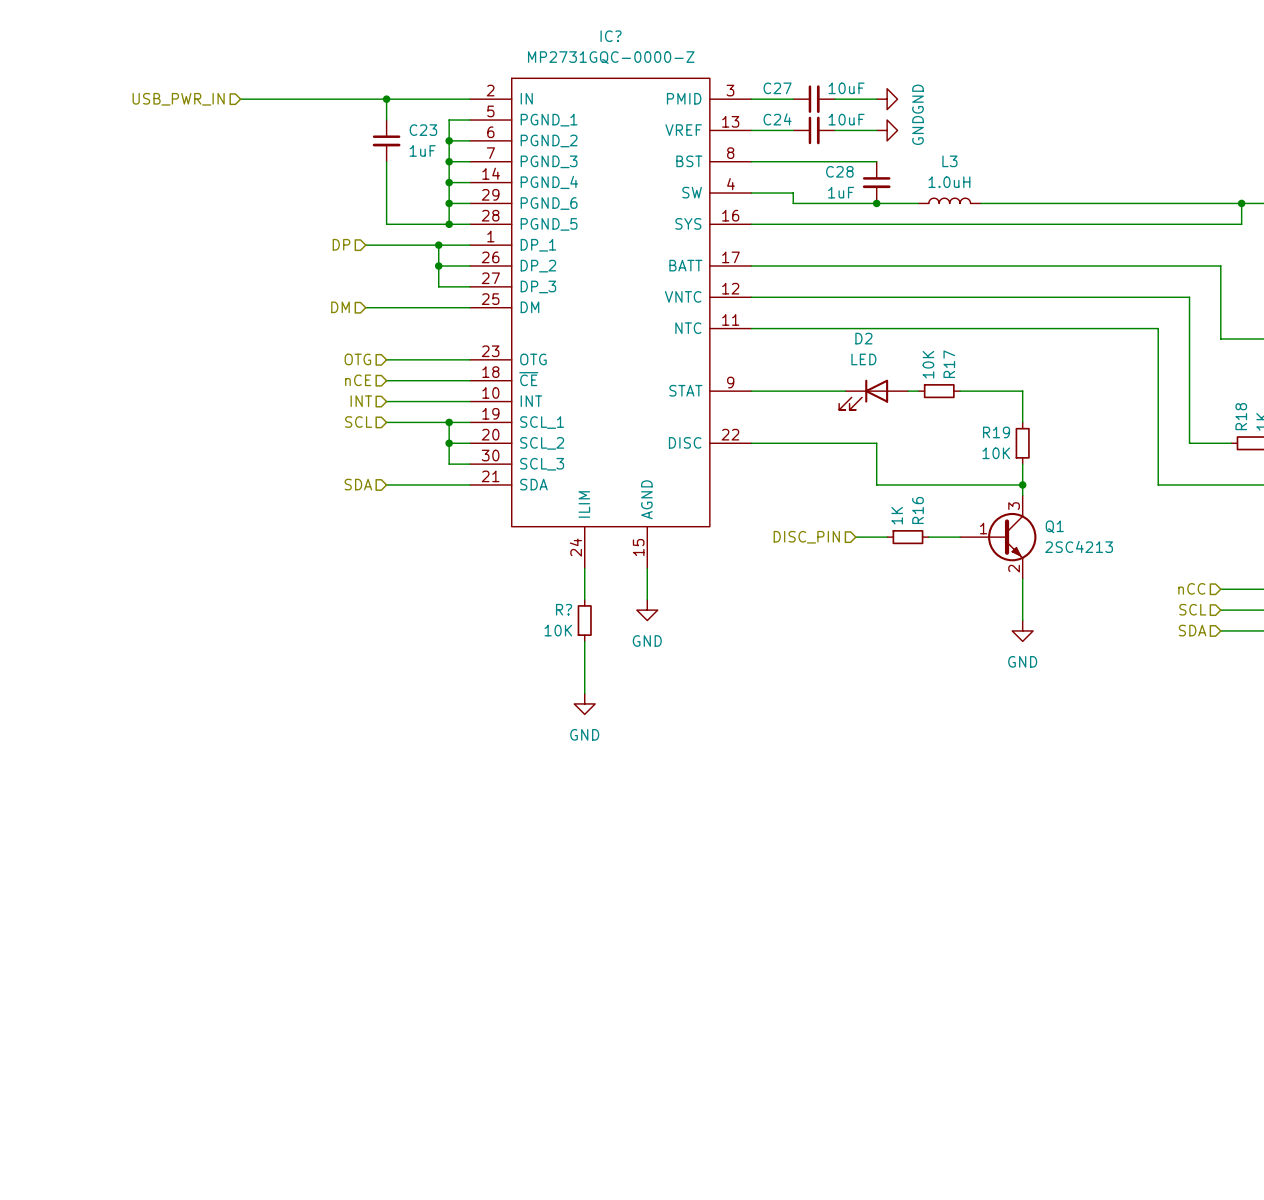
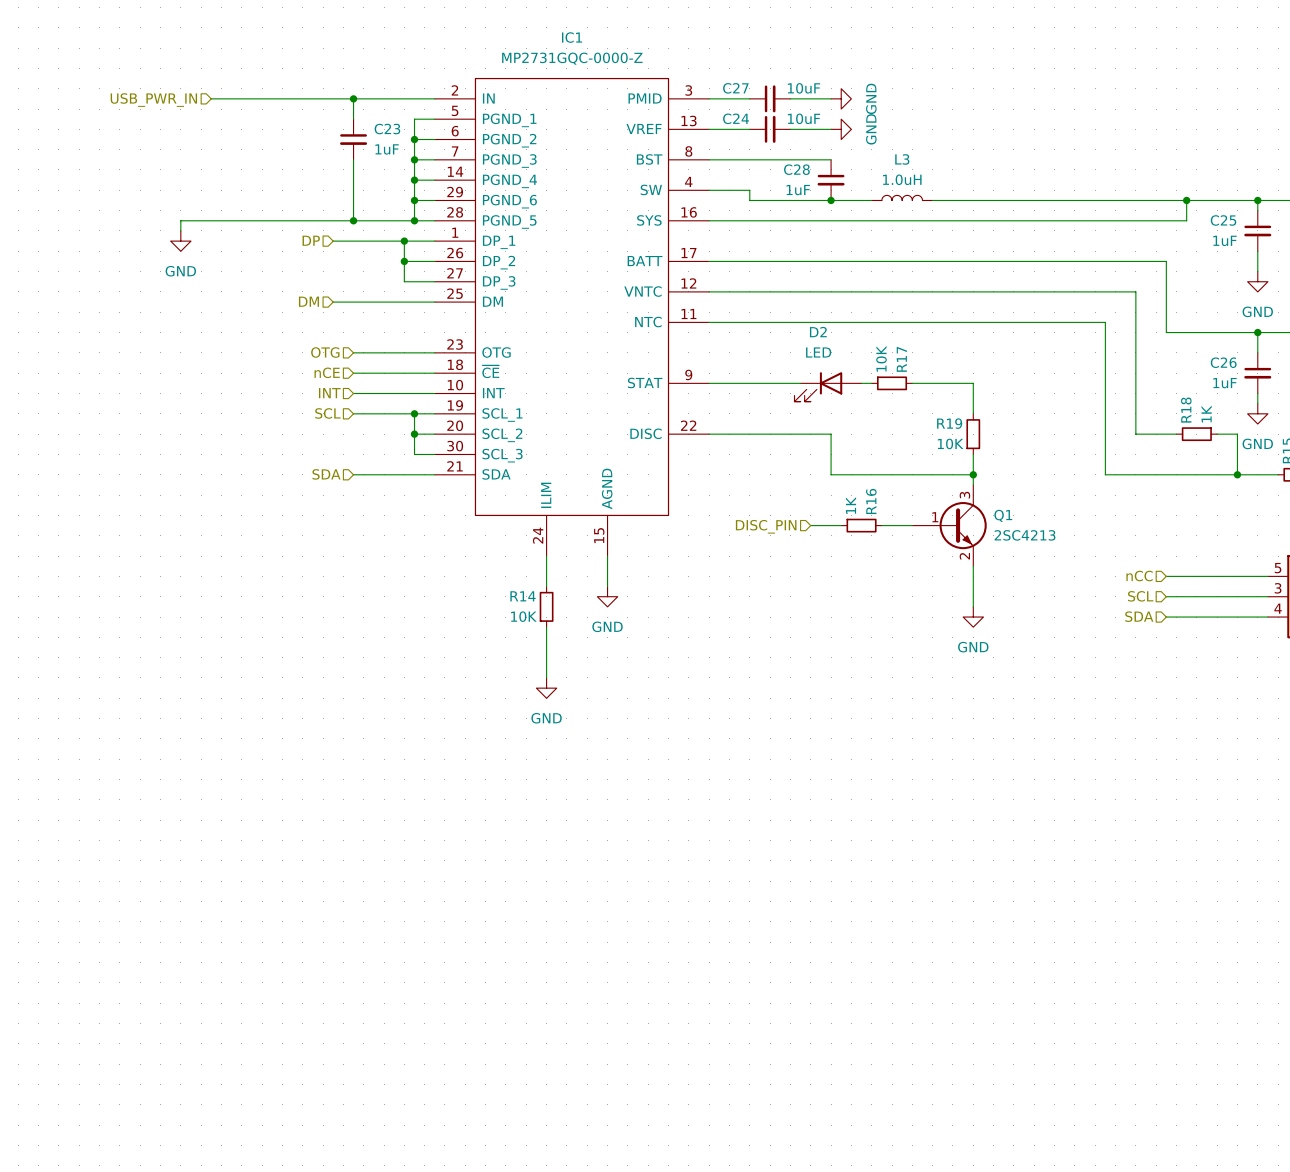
IC? name: IC? (611, 36) -> IC1 (572, 37)
wire: none -> (353, 220) (180, 220) (180, 230)
junction: none -> (353, 220)
power symbol: none -> GND (180, 241)
R? name: R? (564, 609) -> R14 (523, 596)

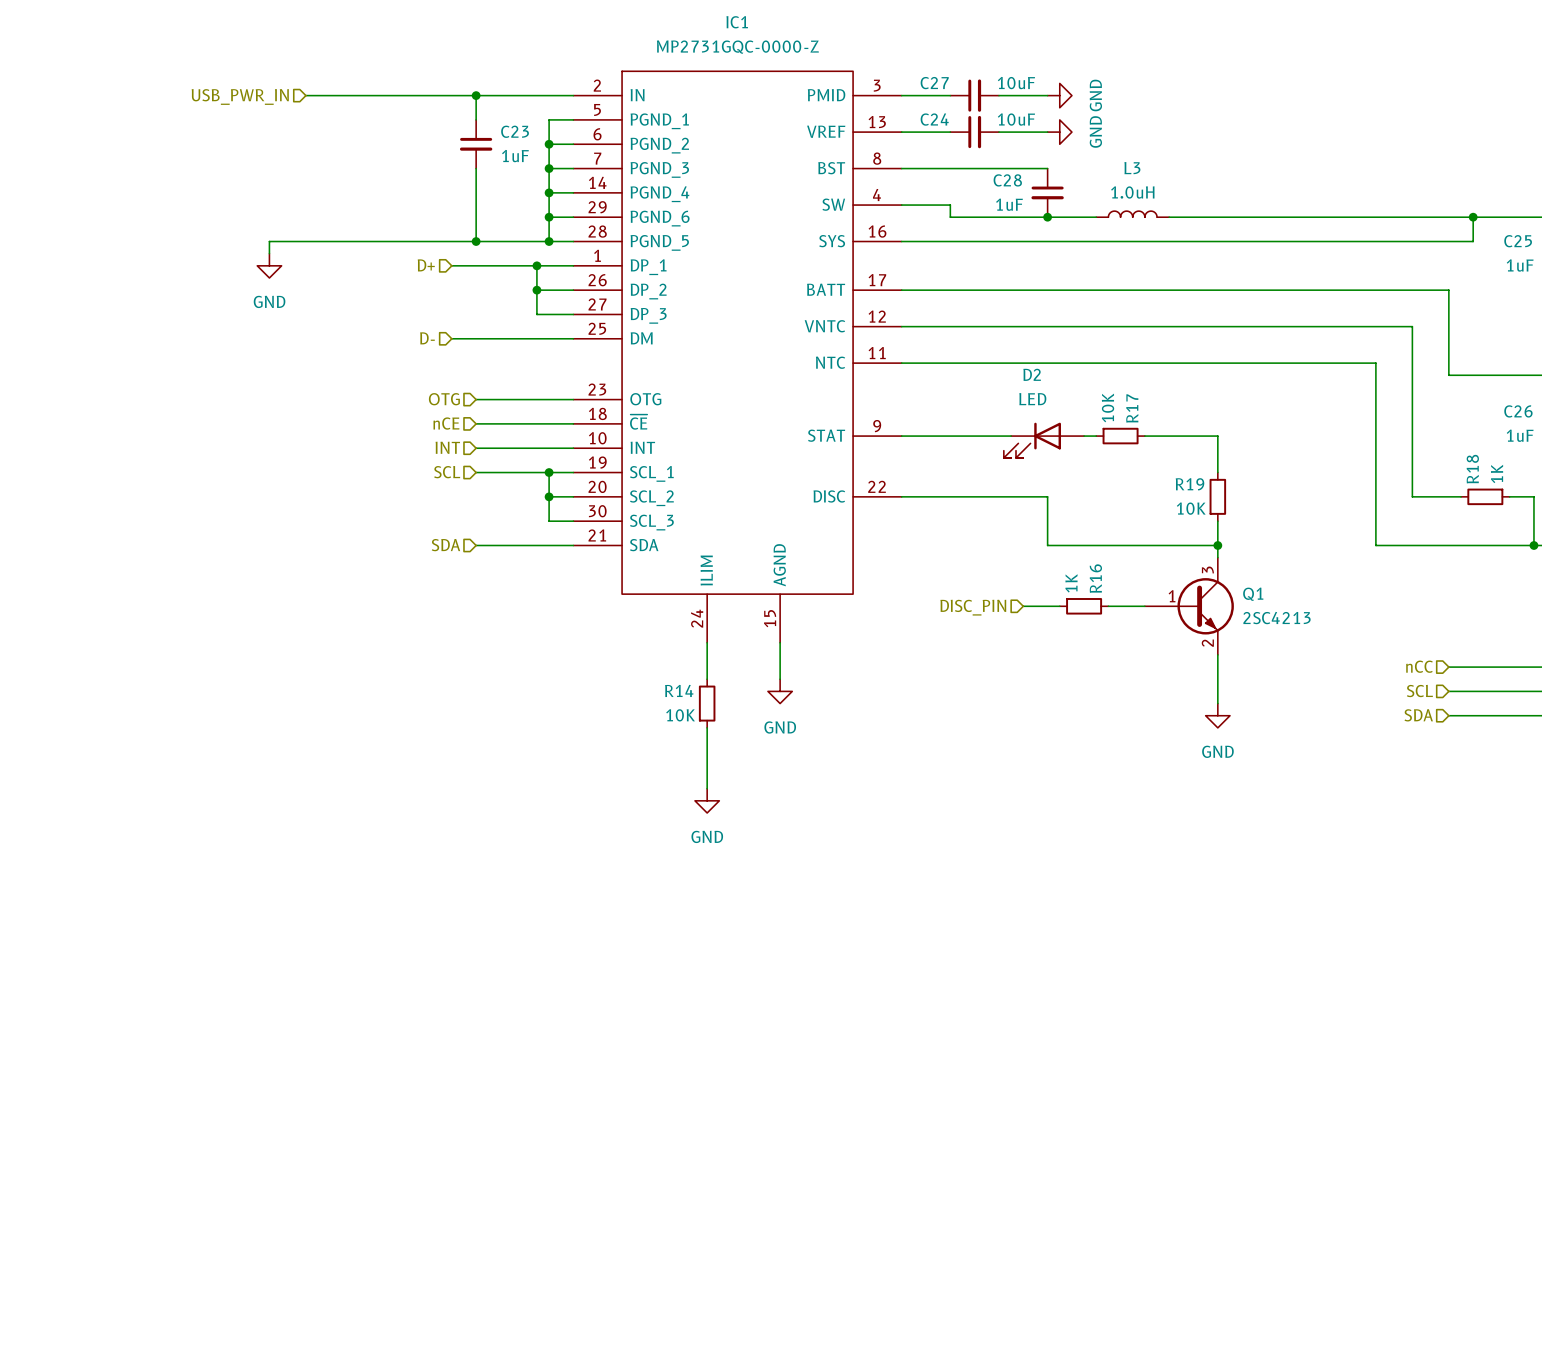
hierarchical label: DP (311, 240) -> D+ (426, 265)
hierarchical label: DM (308, 301) -> D- (427, 338)

